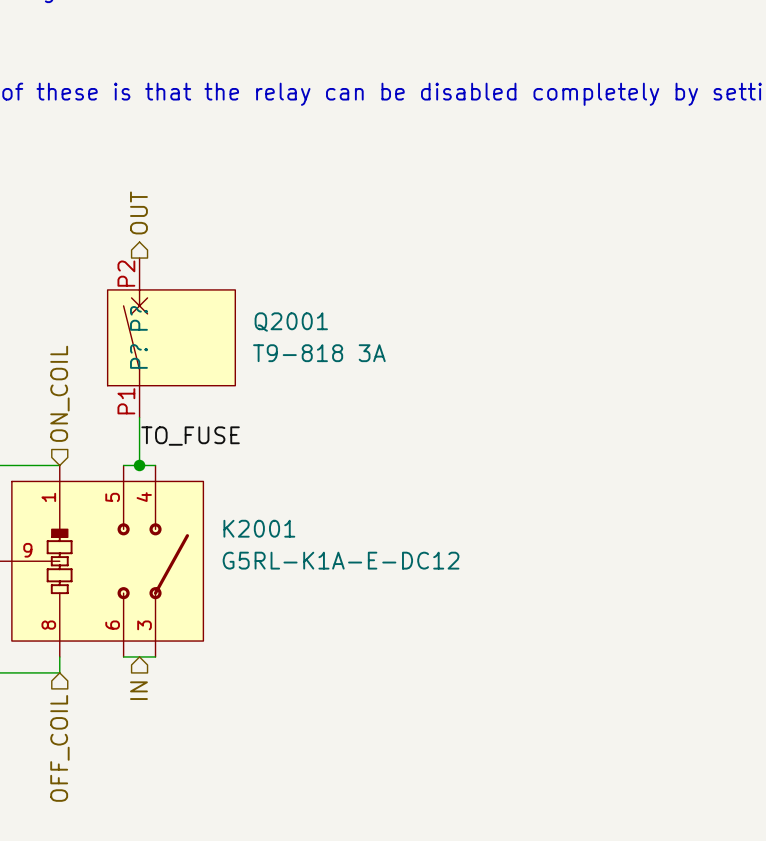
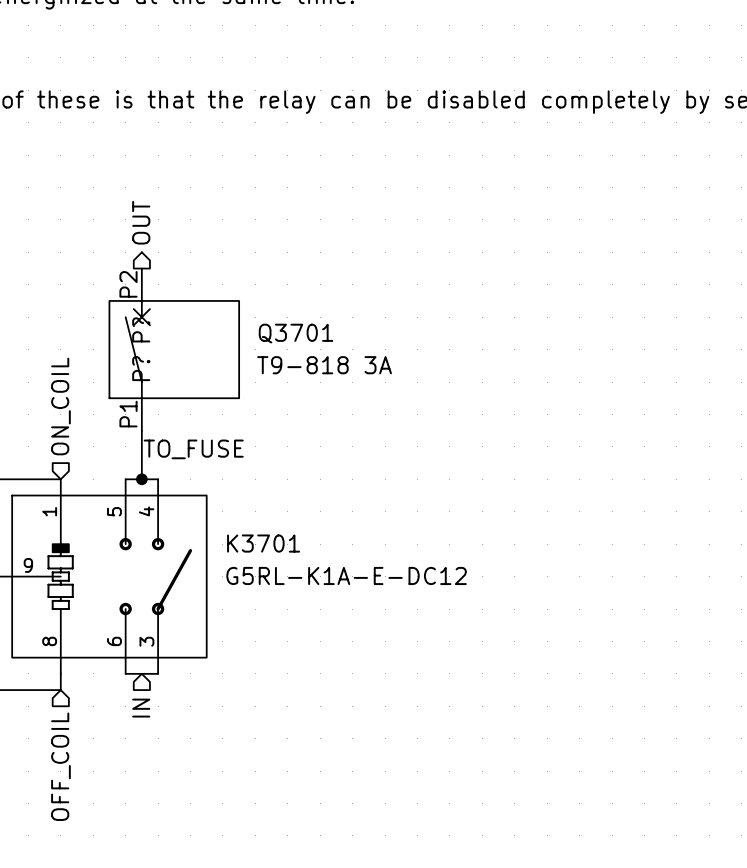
Q2001 name: Q2001 (291, 322) -> Q3701 (296, 333)
K2001 name: K2001 (259, 528) -> K3701 (263, 543)

